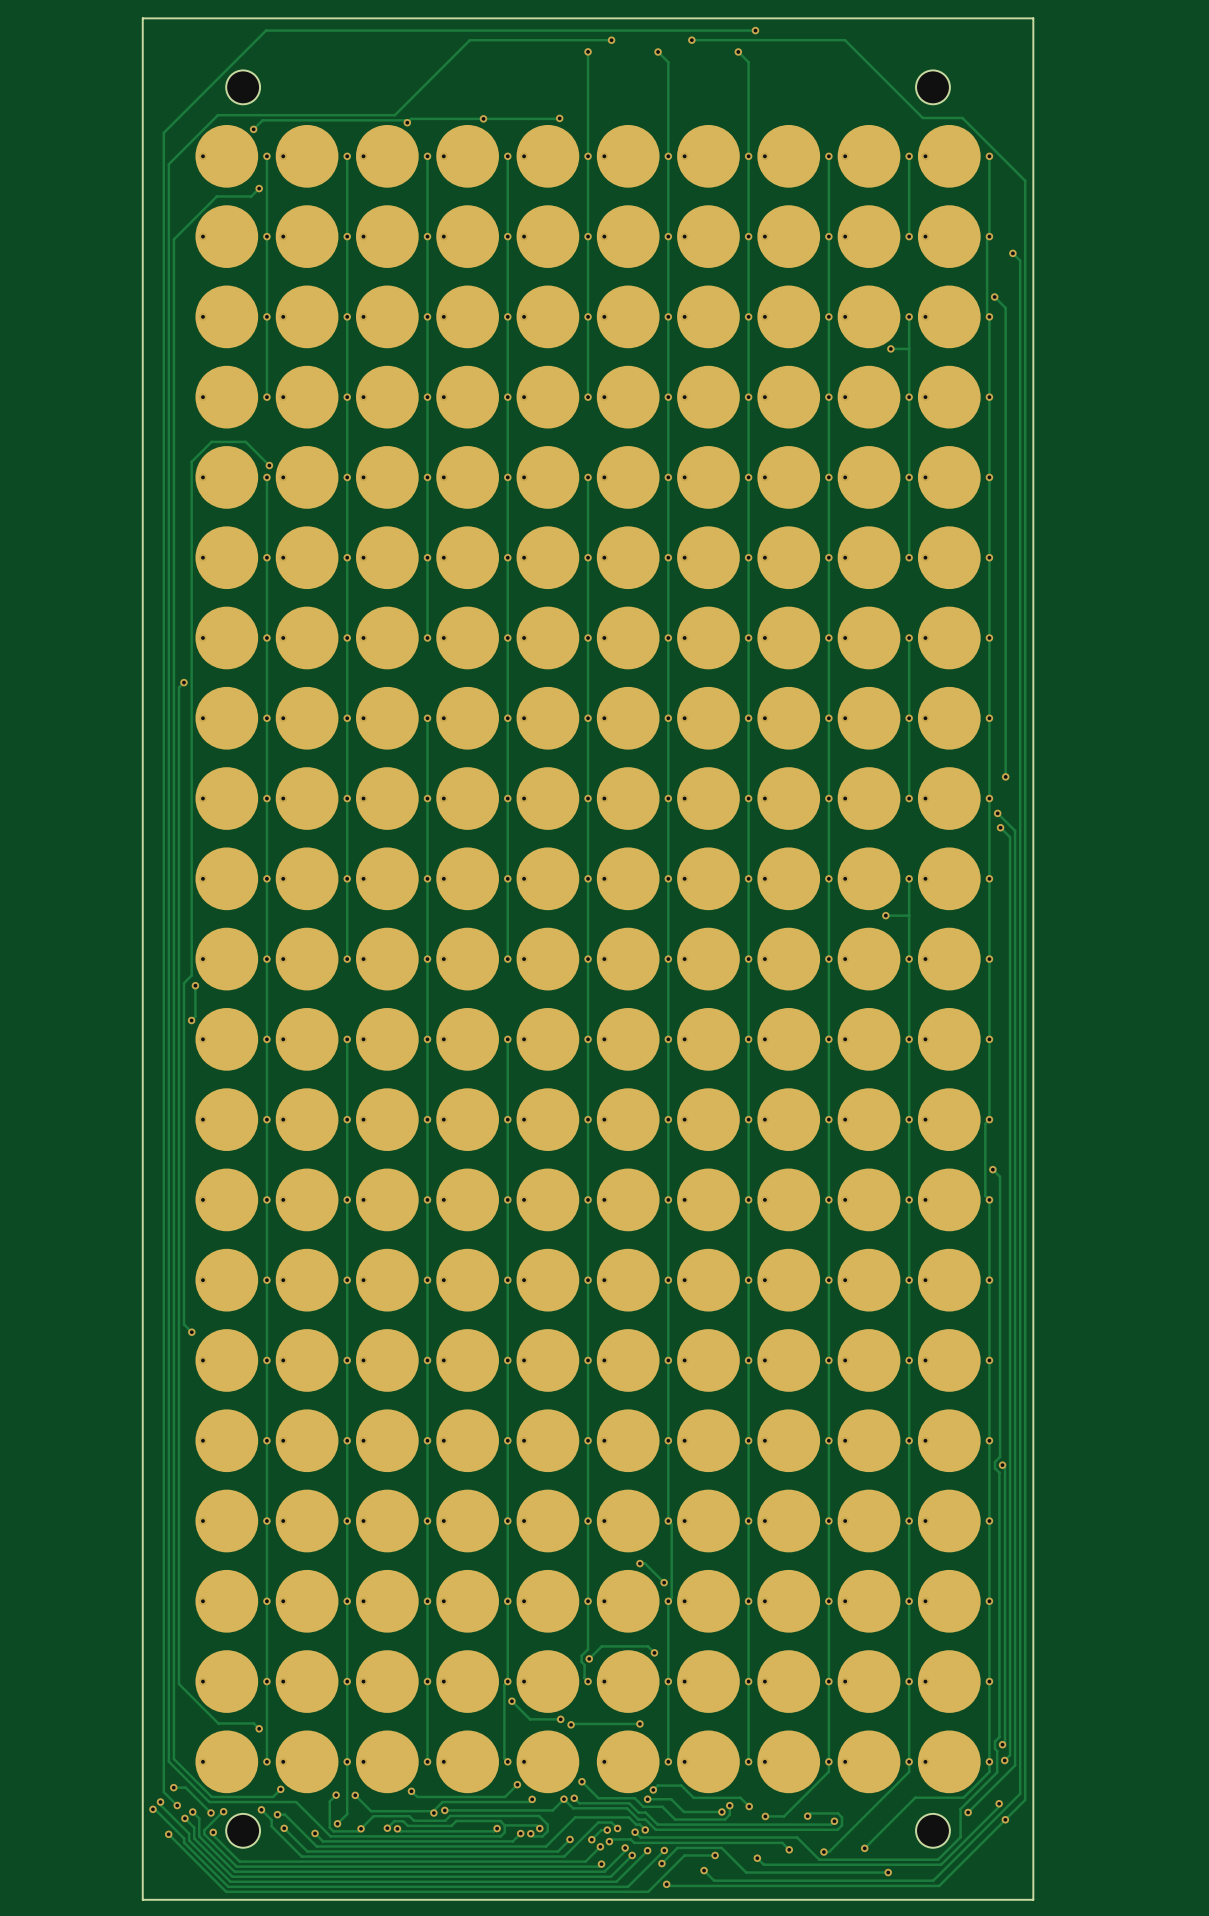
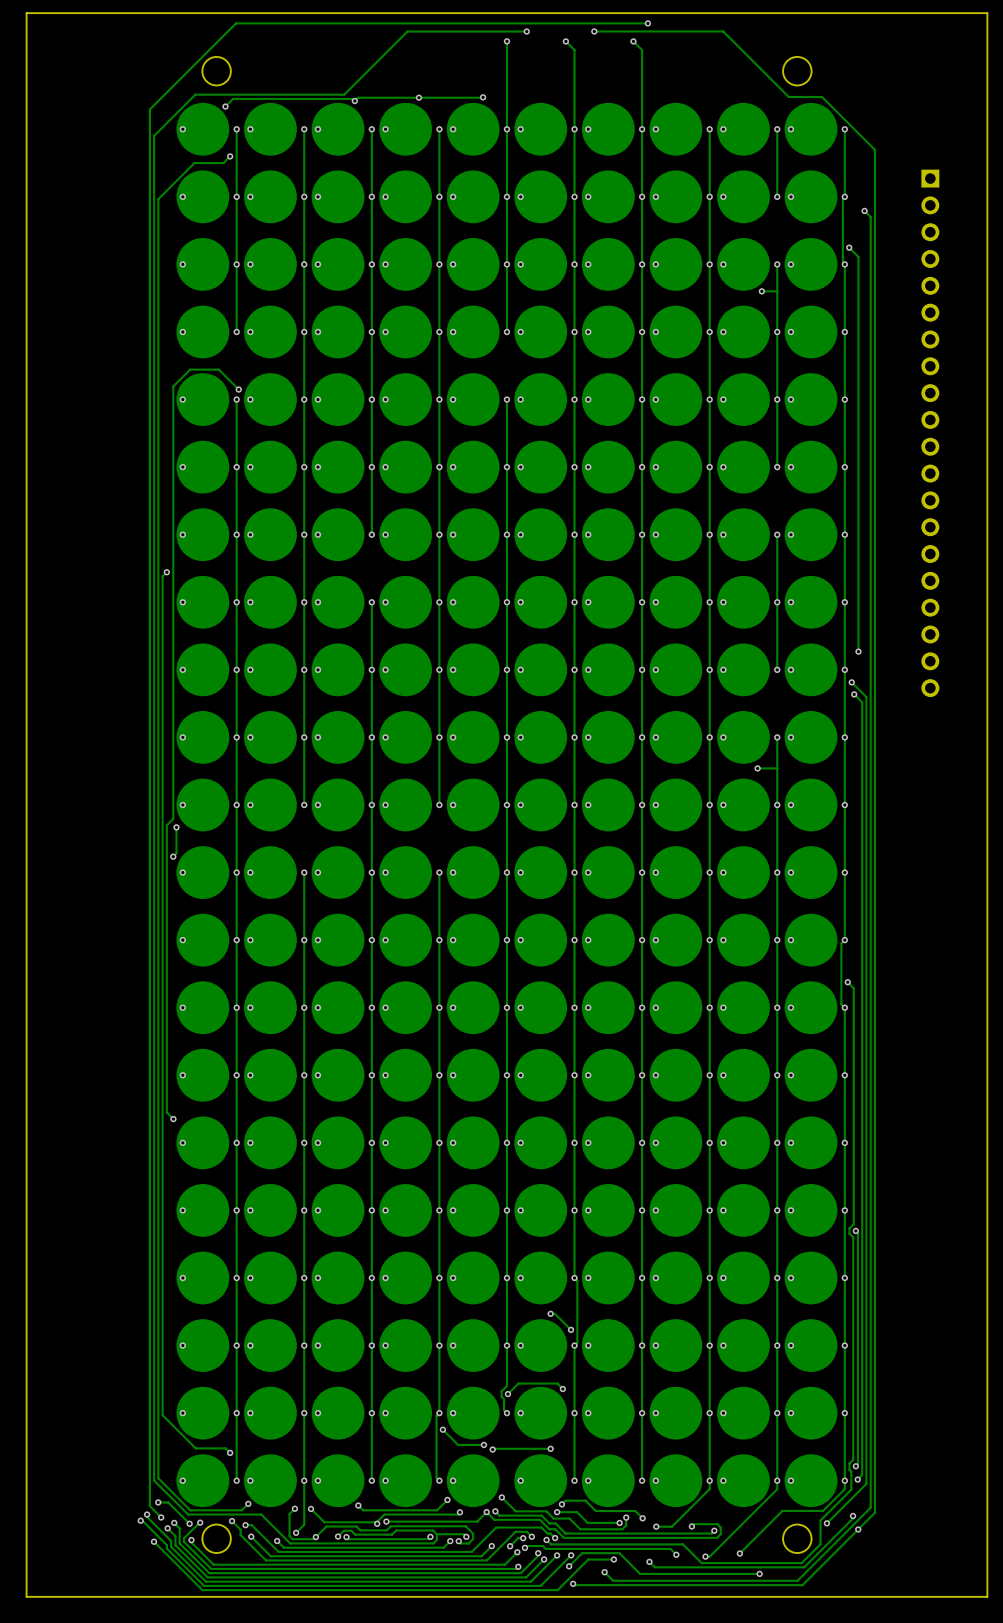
board edge: (142, 18) (142, 1899) -> (132, 13) (26, 13) (26, 1596) (132, 1596)
board edge: (1033, 18) (1033, 1899) -> (881, 13) (987, 13) (987, 1596) (881, 1596)
part: none -> (930, 433)

